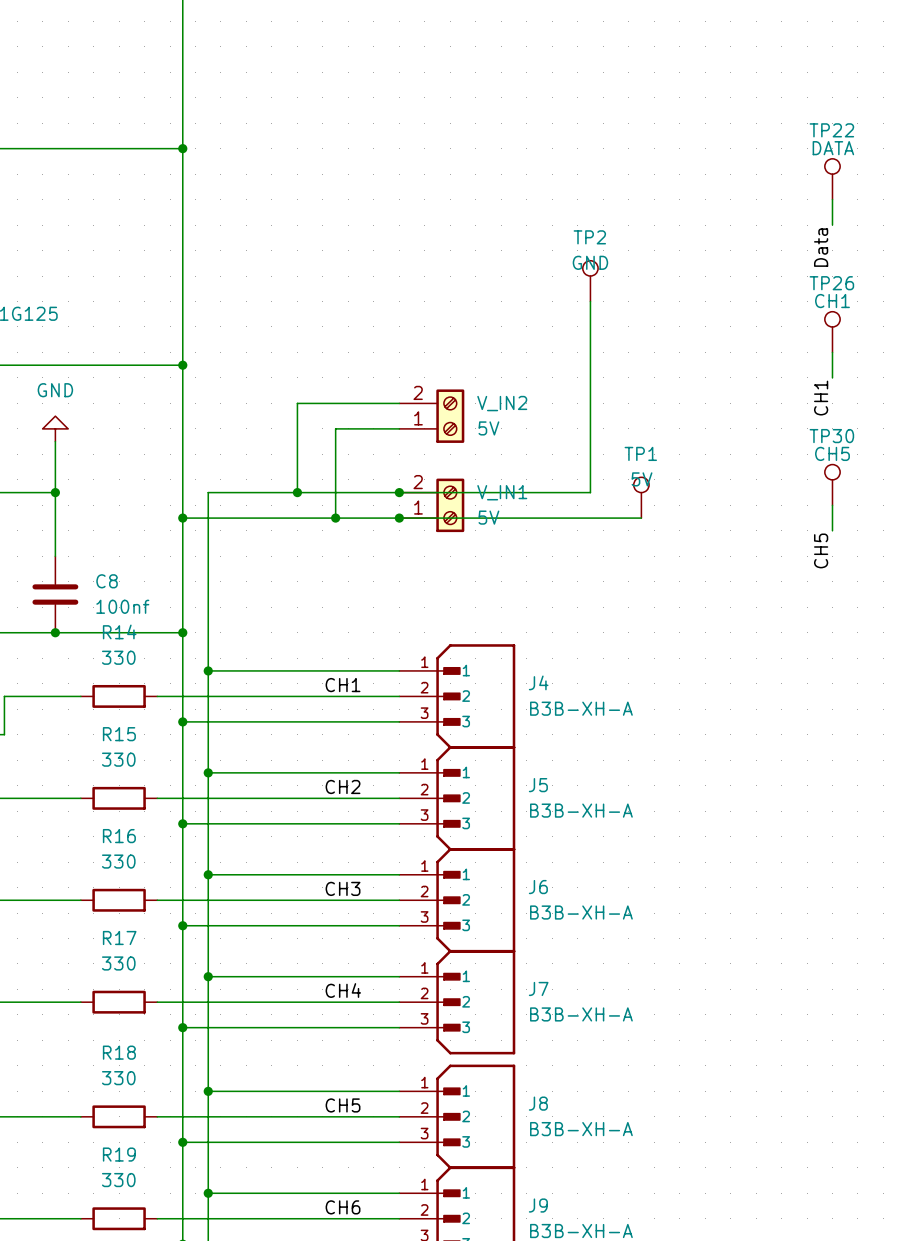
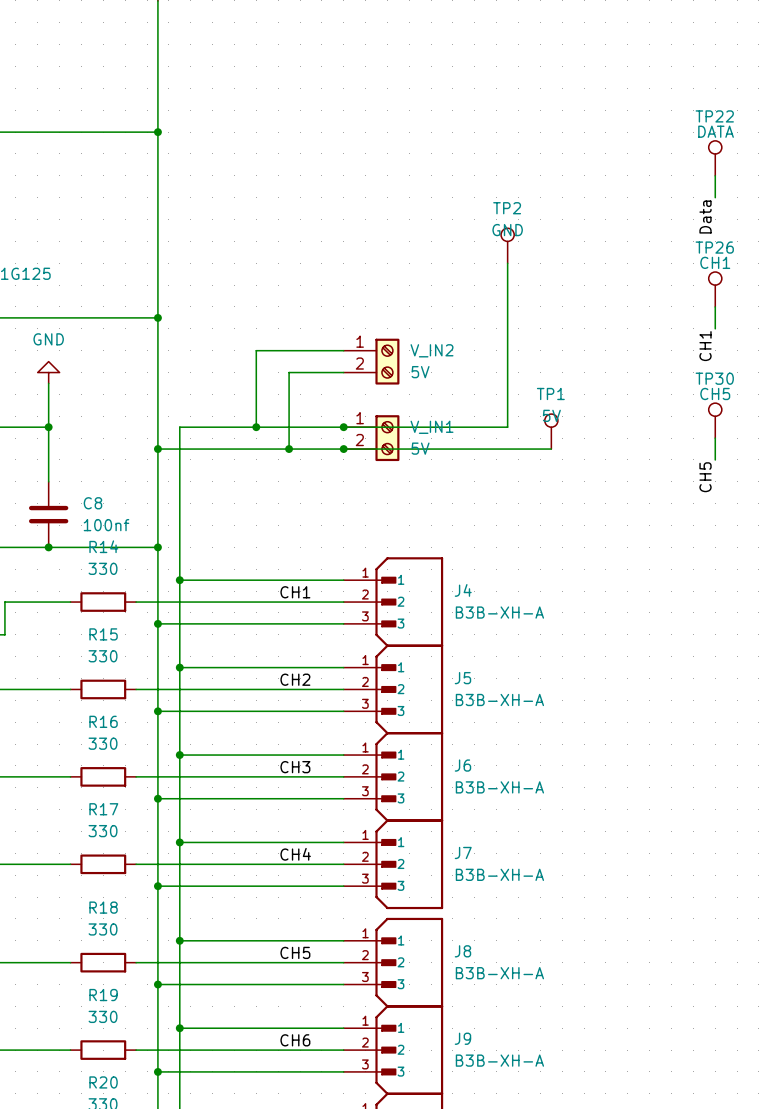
V_IN2 flip: as is (450, 416) -> up-down (387, 361)
V_IN1 flip: as is (450, 505) -> up-down (387, 438)

